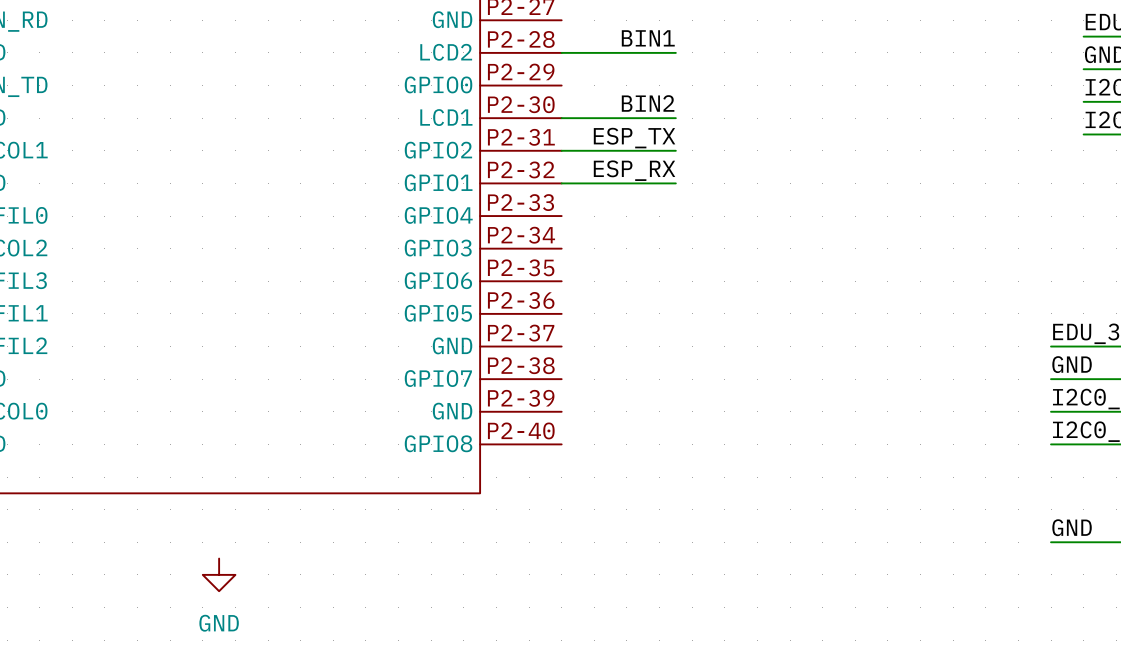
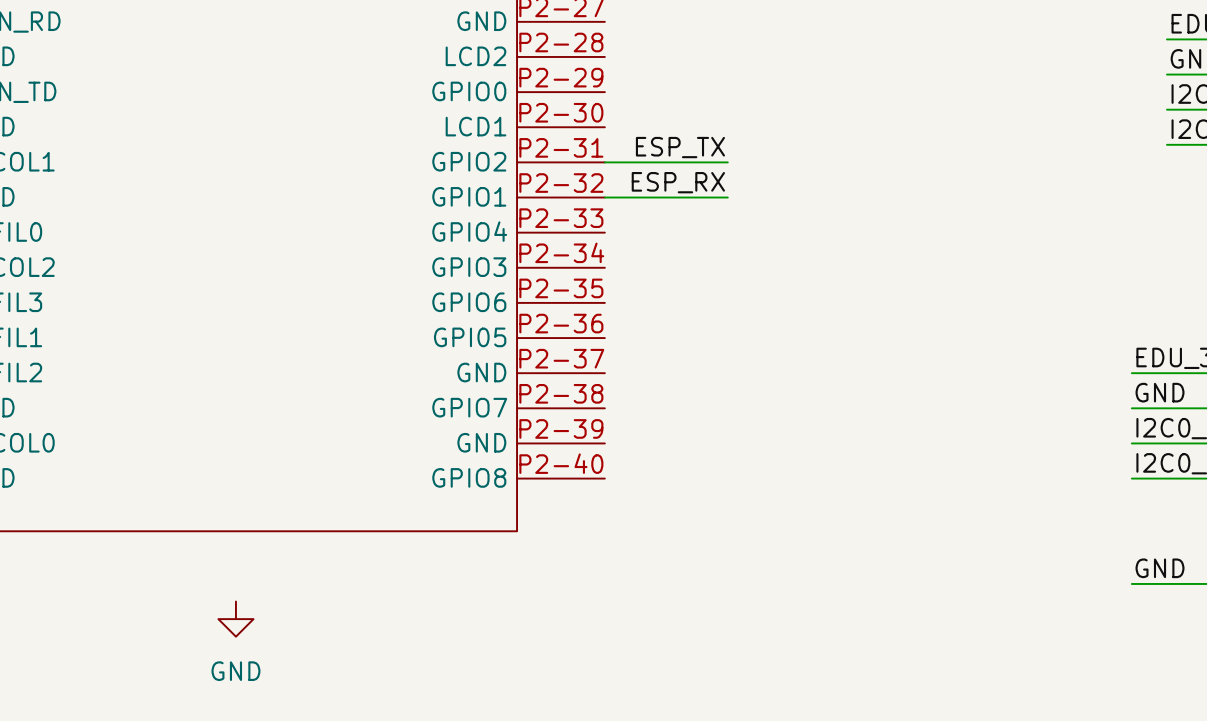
label: BIN1 (648, 38) -> none
wire: (561, 52) (675, 52) -> none
label: BIN2 (648, 103) -> none
wire: (561, 118) (675, 118) -> none

